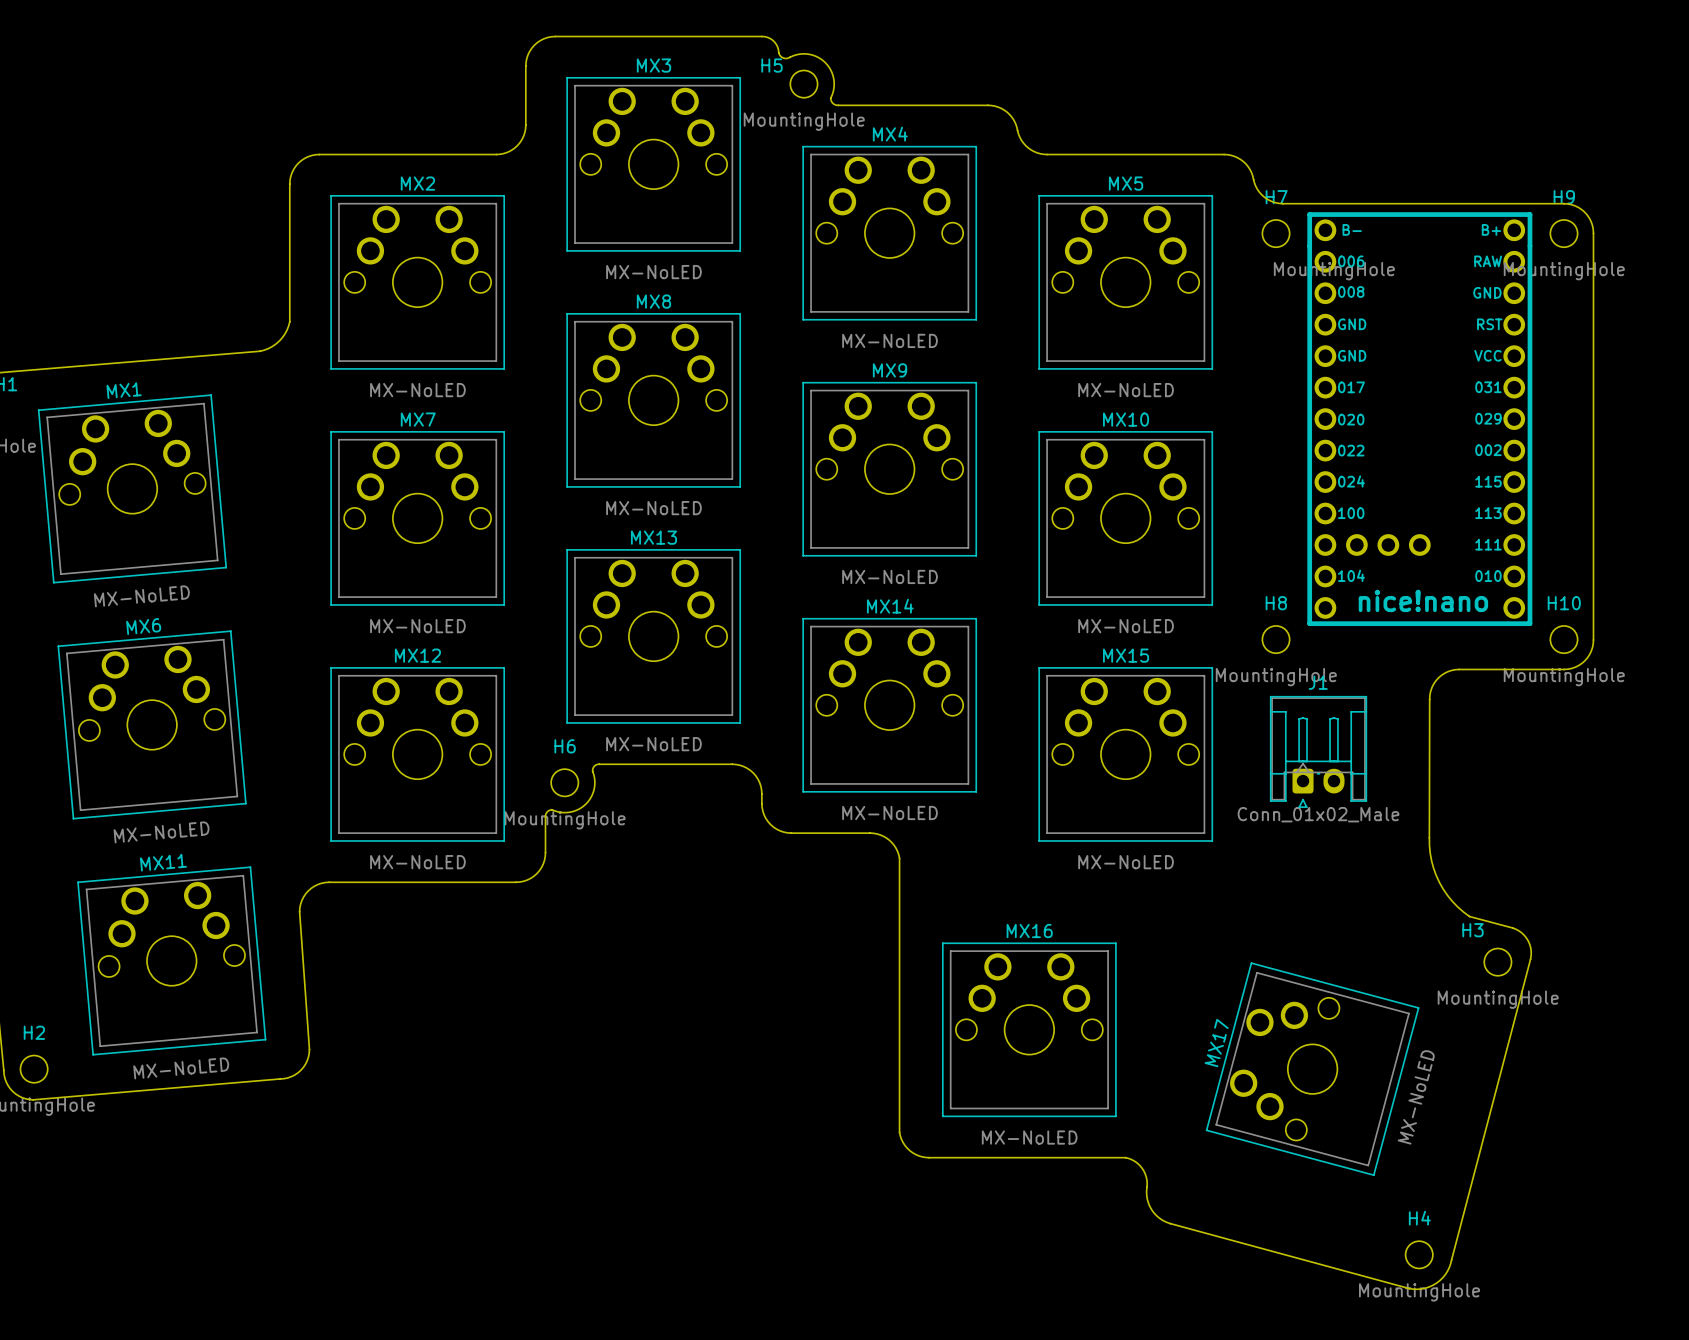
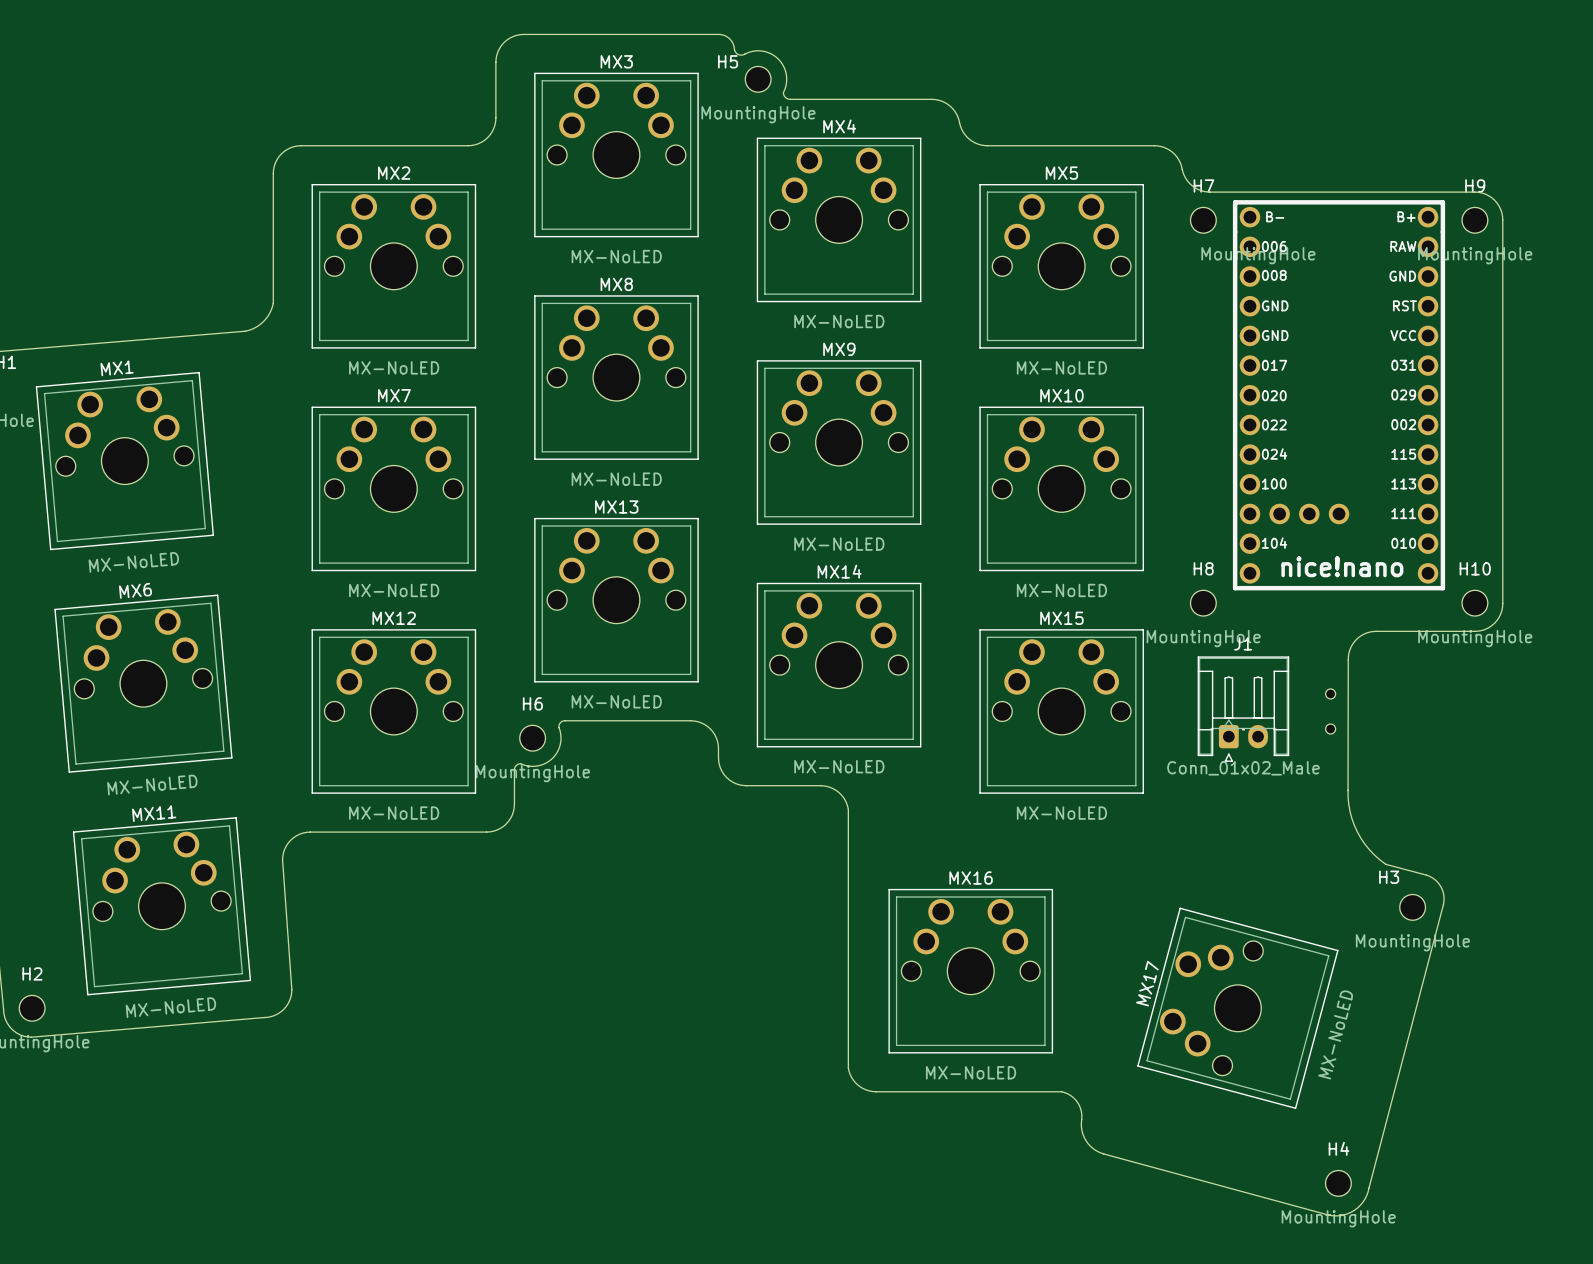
part: none -> (1330, 711)

